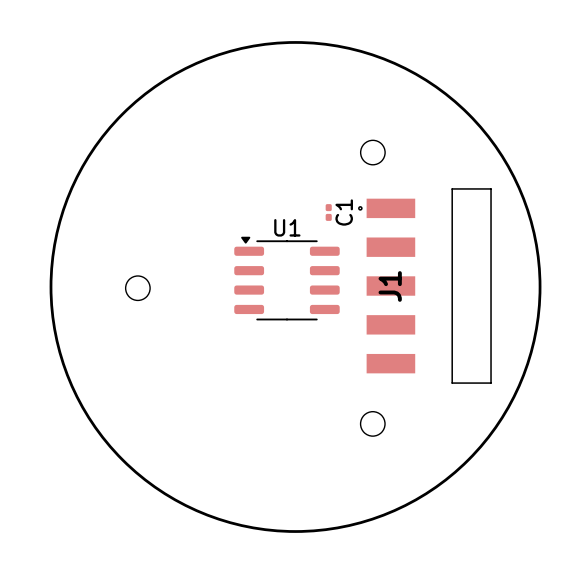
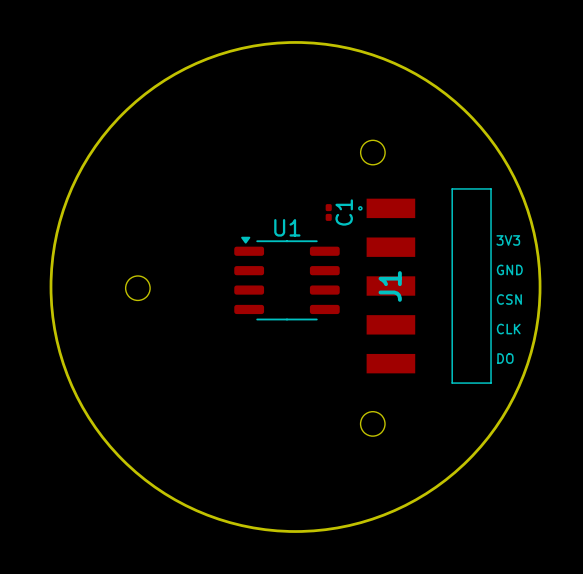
text: none -> 3V3 (508, 240)
text: none -> GND (509, 269)
text: none -> CSN (509, 299)
text: none -> CLK (508, 329)
text: none -> DO (505, 358)

